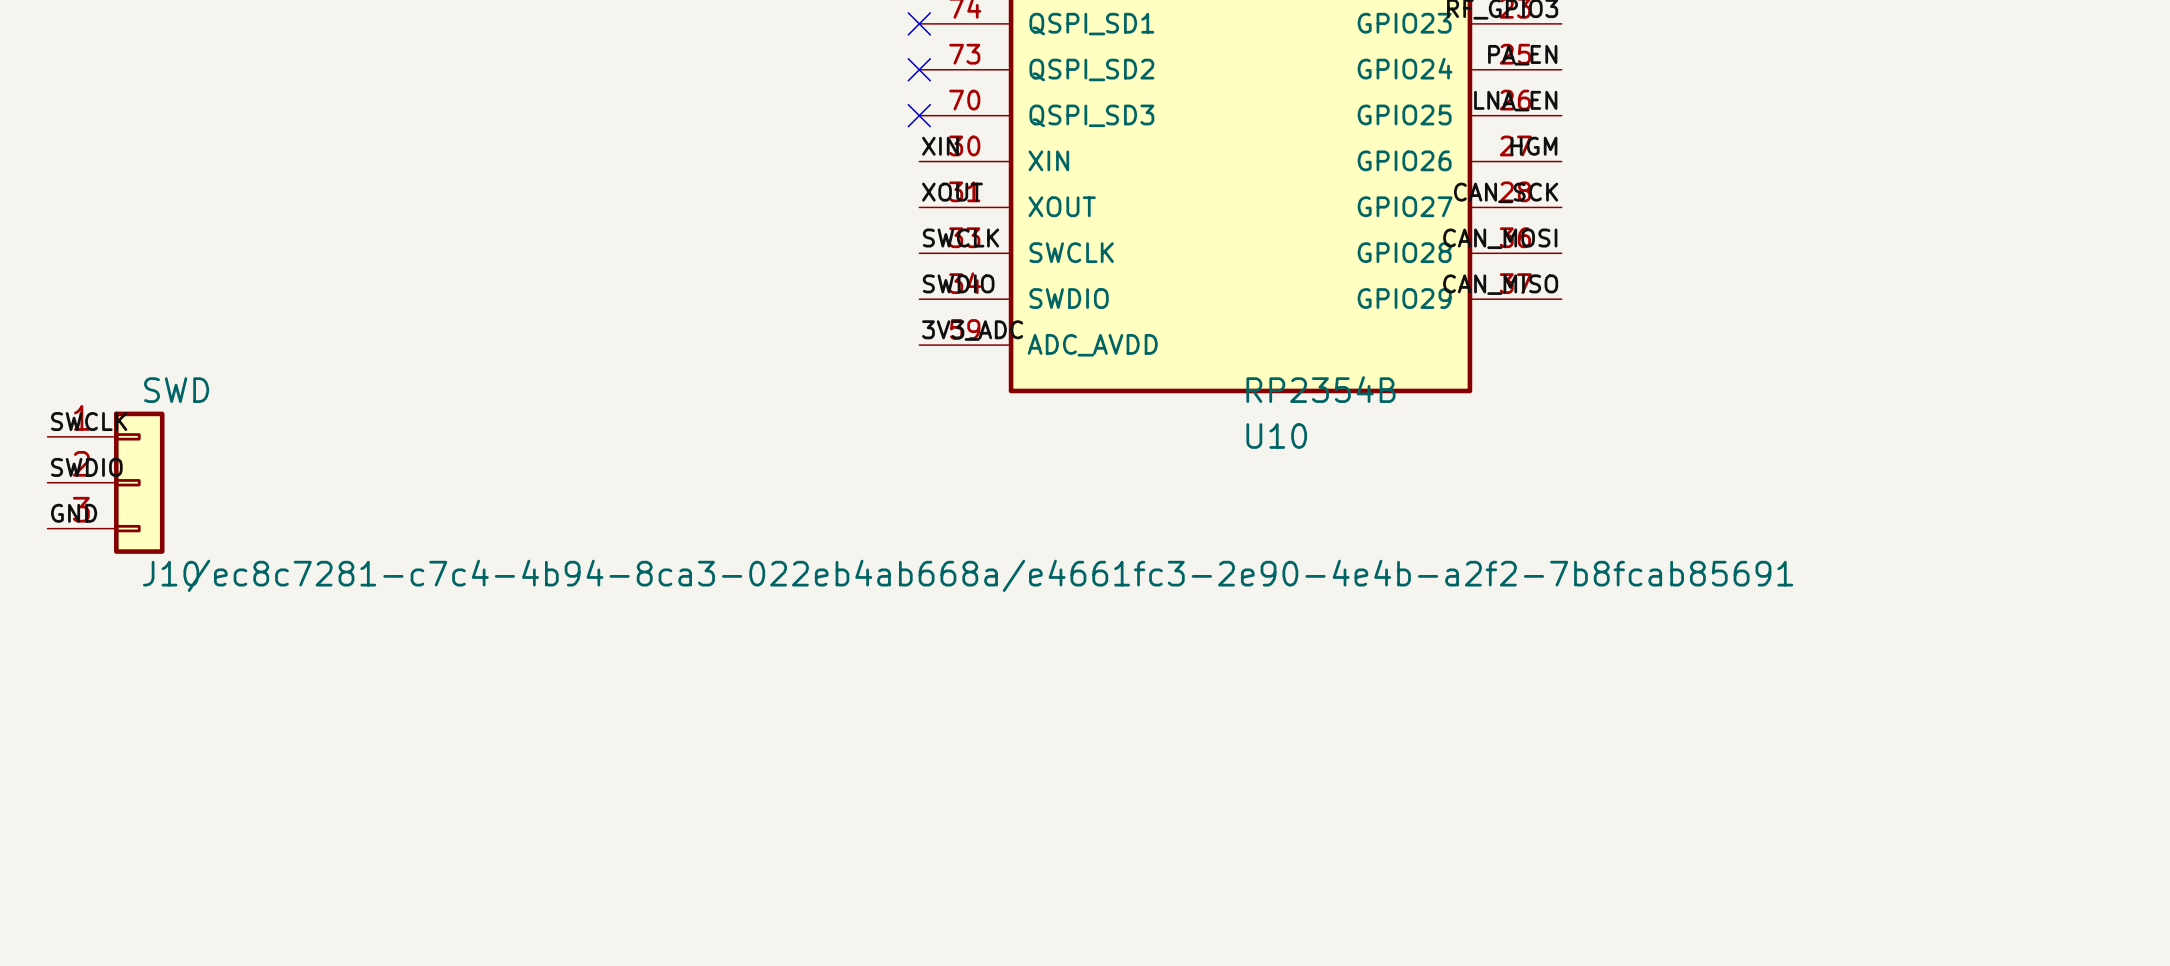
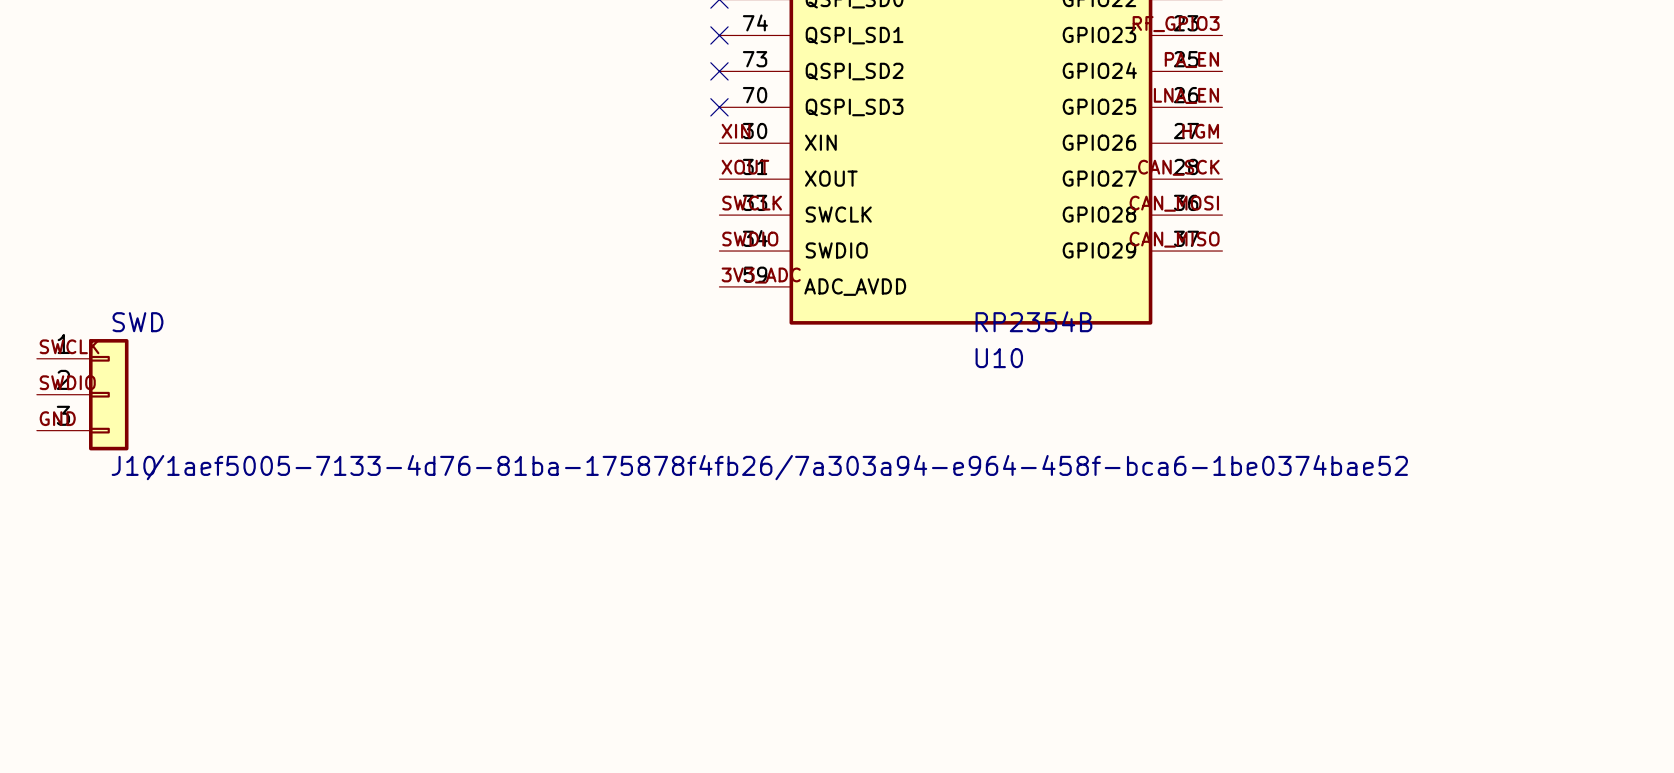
J10 text: /ec8c7281-c7c4-4b94-8ca3-022eb4ab668a/e4661fc3-2e90-4e4b-a2f2-7b8fcab85691 (990, 575) -> /1aef5005-7133-4d76-81ba-175878f4fb26/7a303a94-e964-458f-bca6-1be0374bae52 (777, 467)

